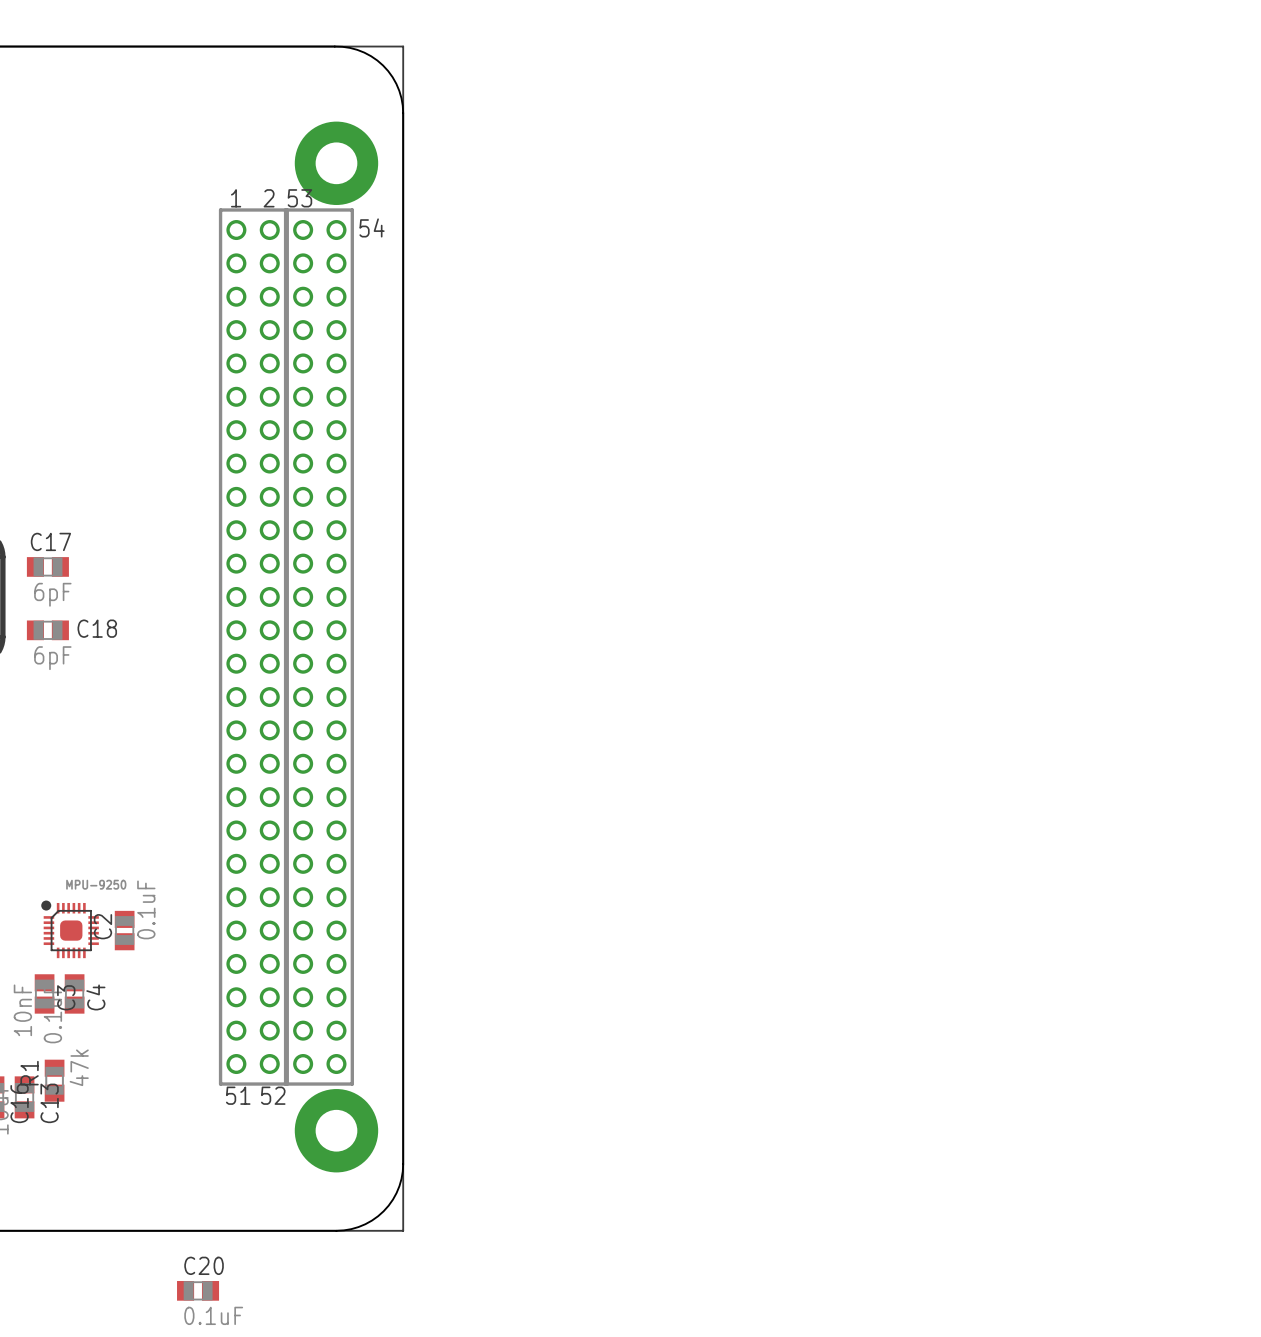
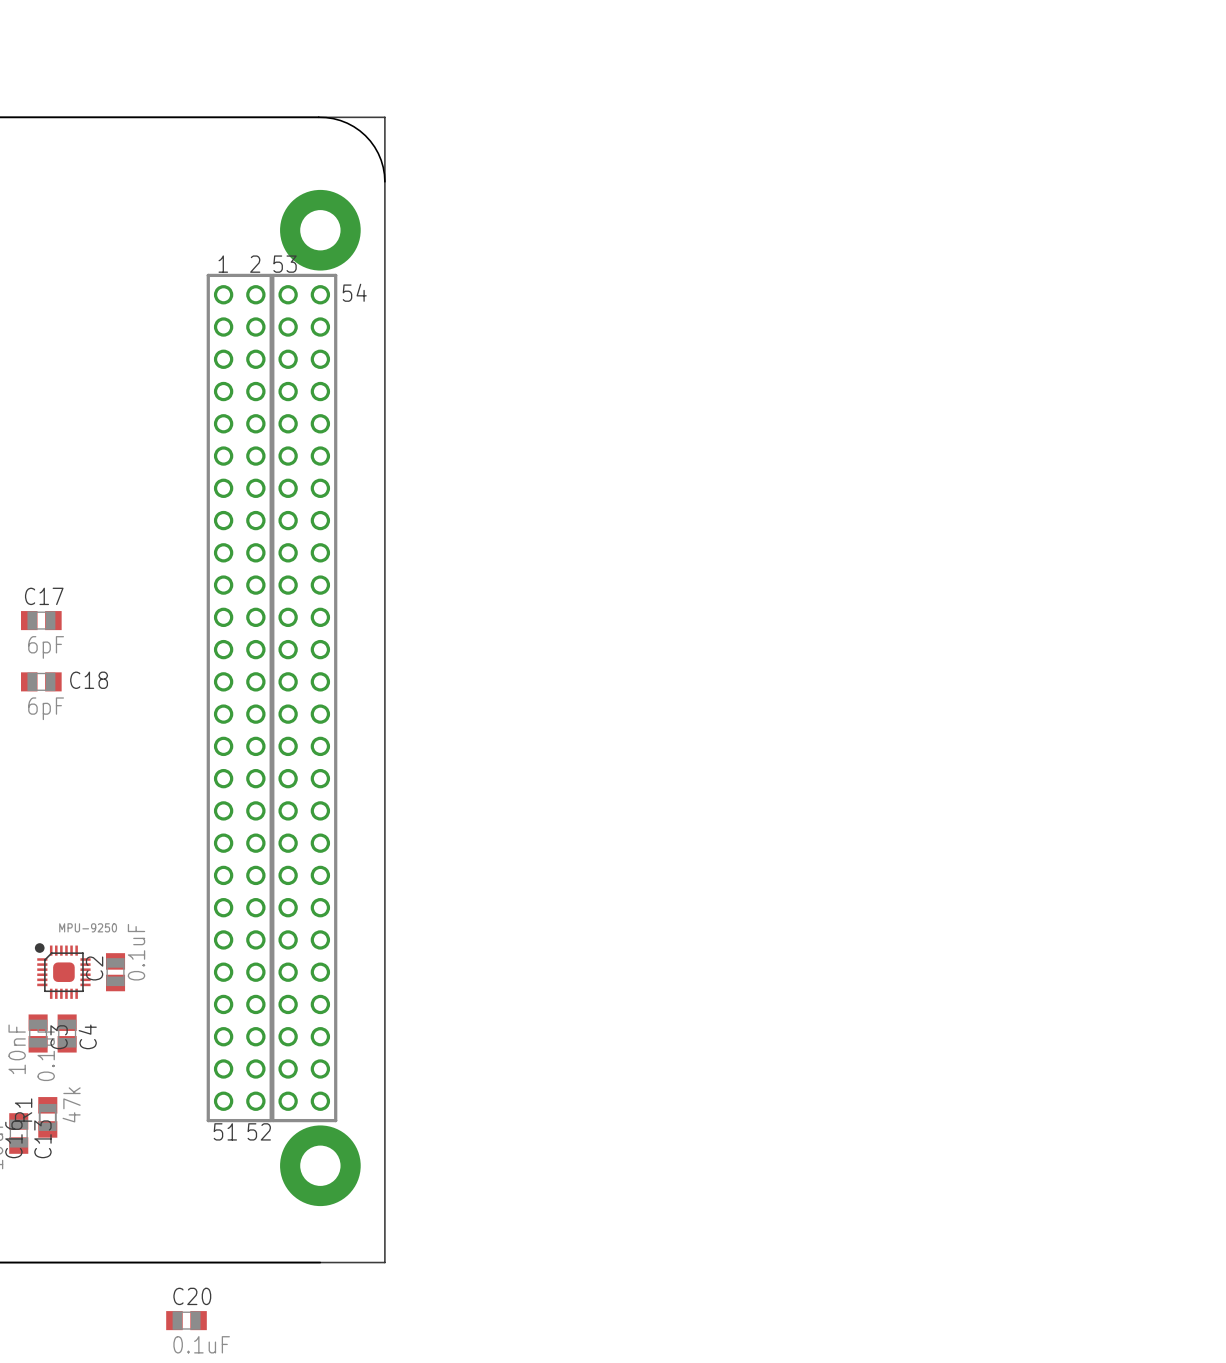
board edge: (403, 113) (402, 1171) (396, 1193) (383, 1211) (365, 1224) (351, 1229) (336, 1230) -> none

